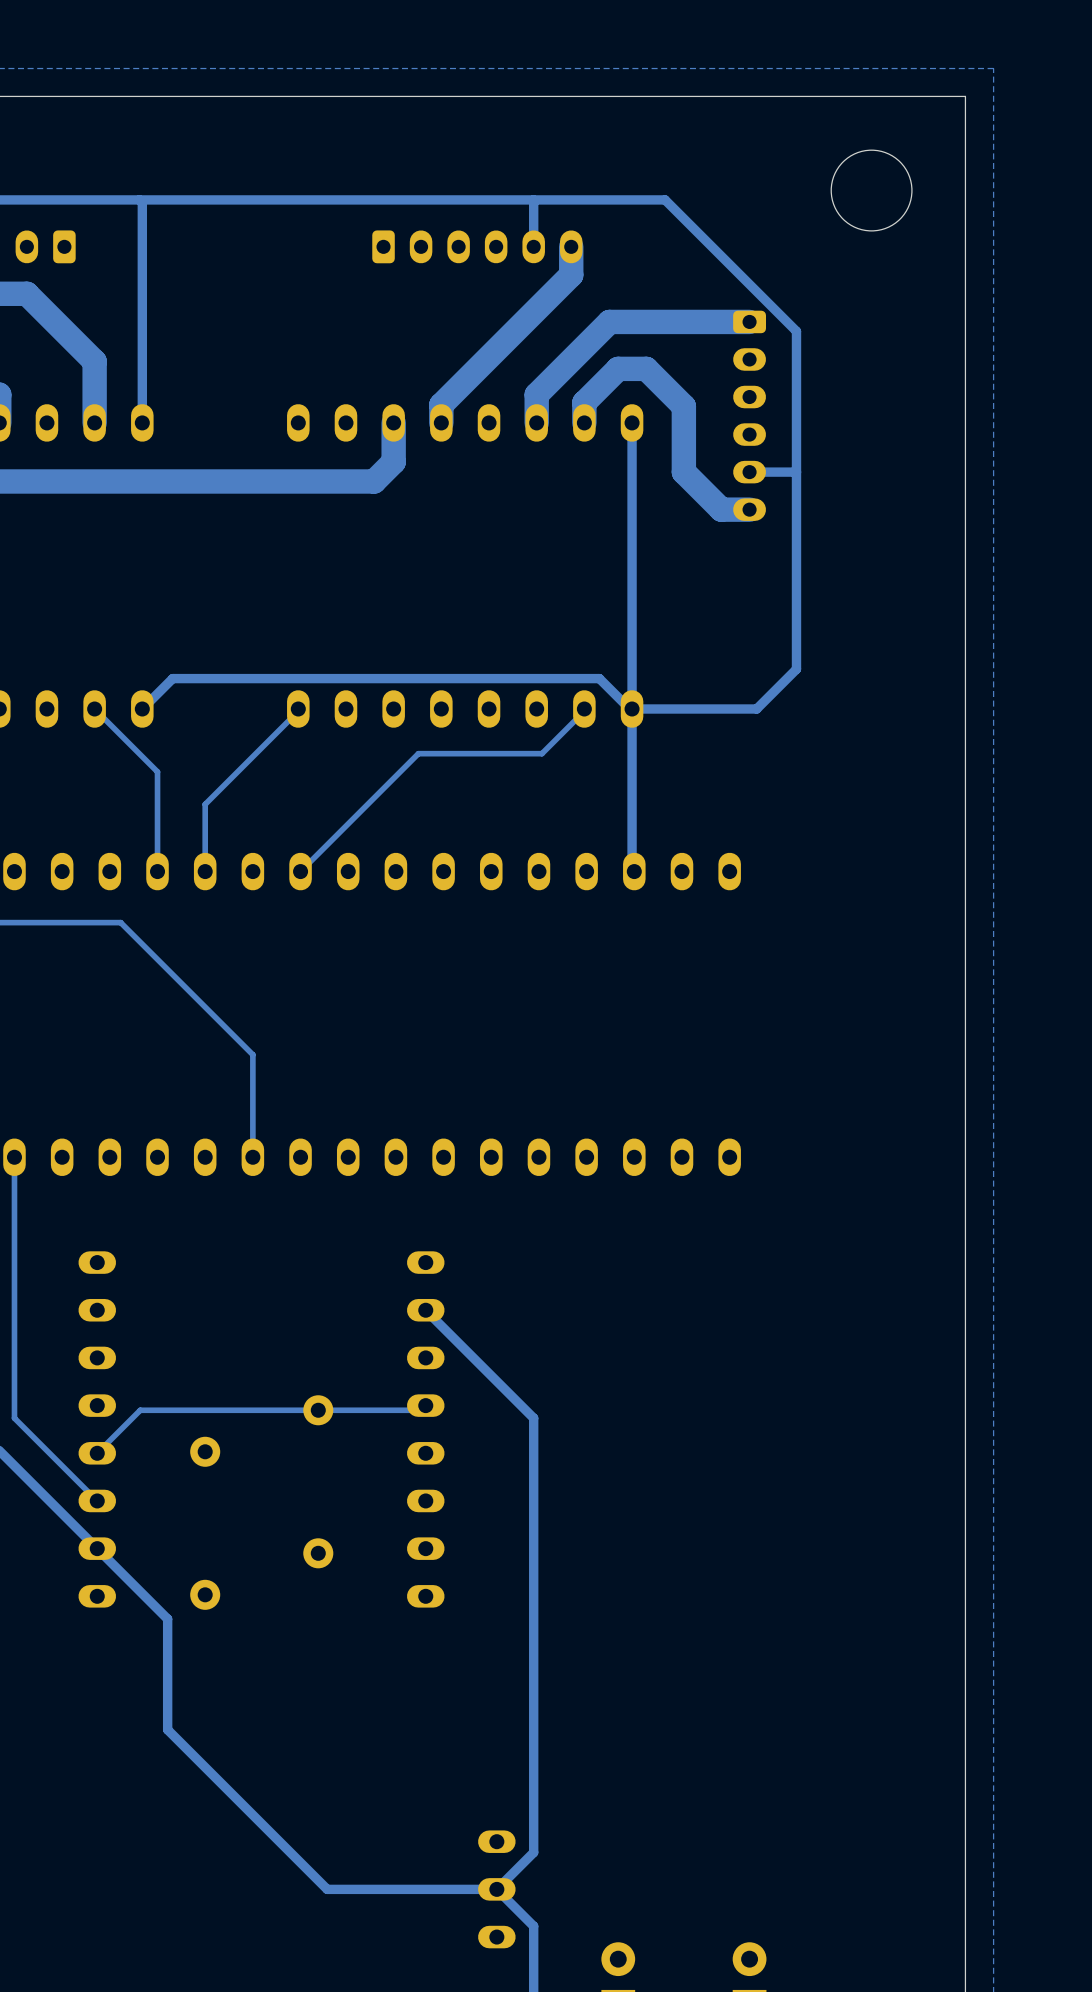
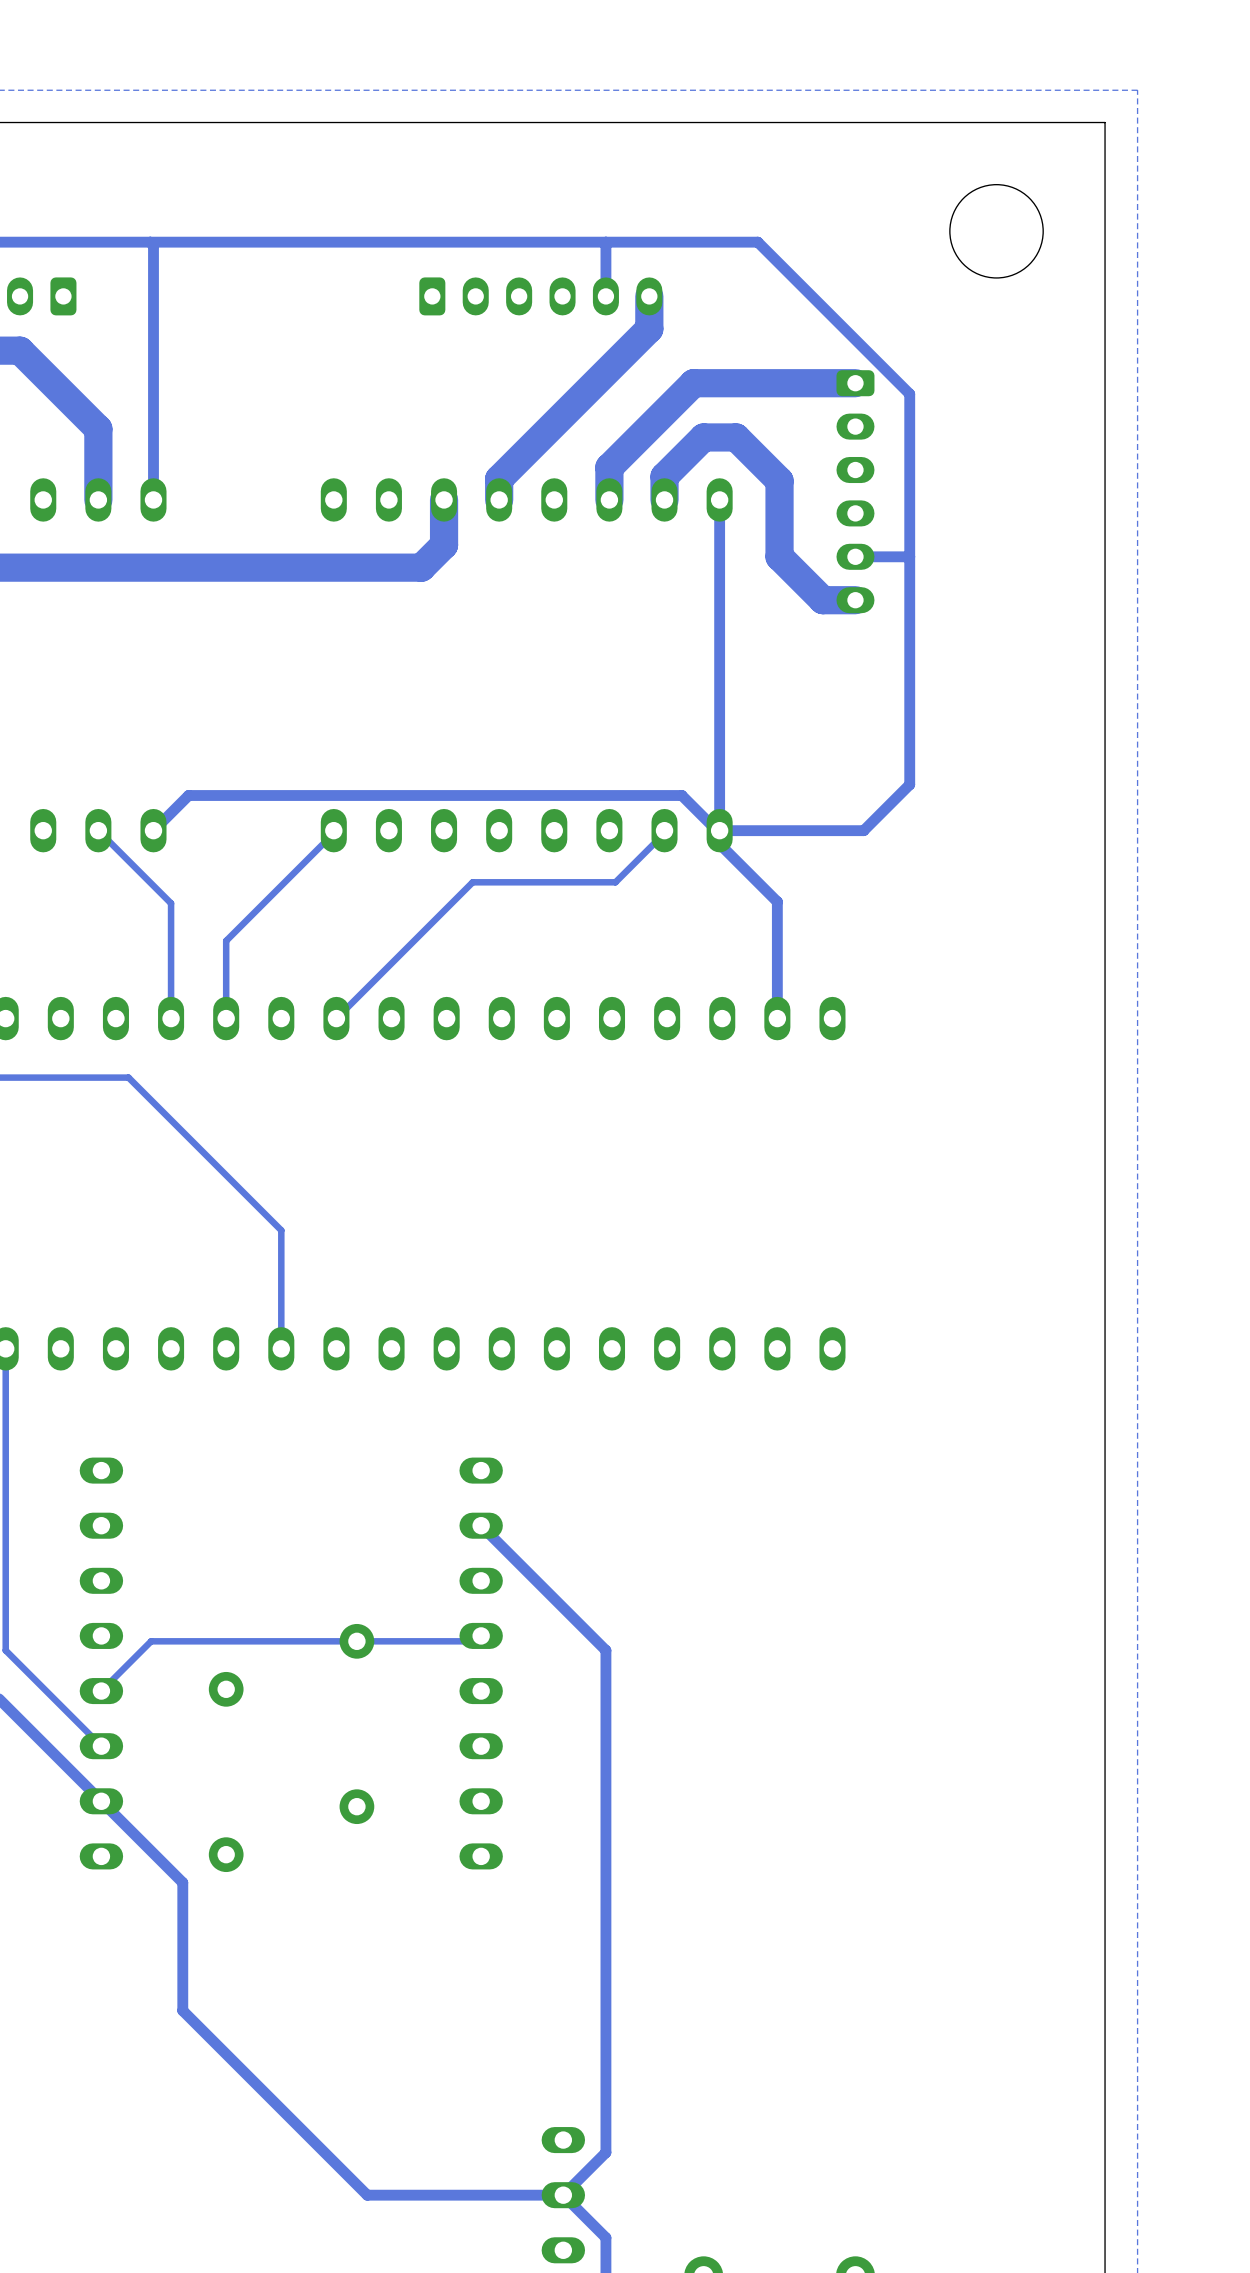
track: (632, 720) (632, 869) -> (719, 844) (777, 901) (777, 1018)

